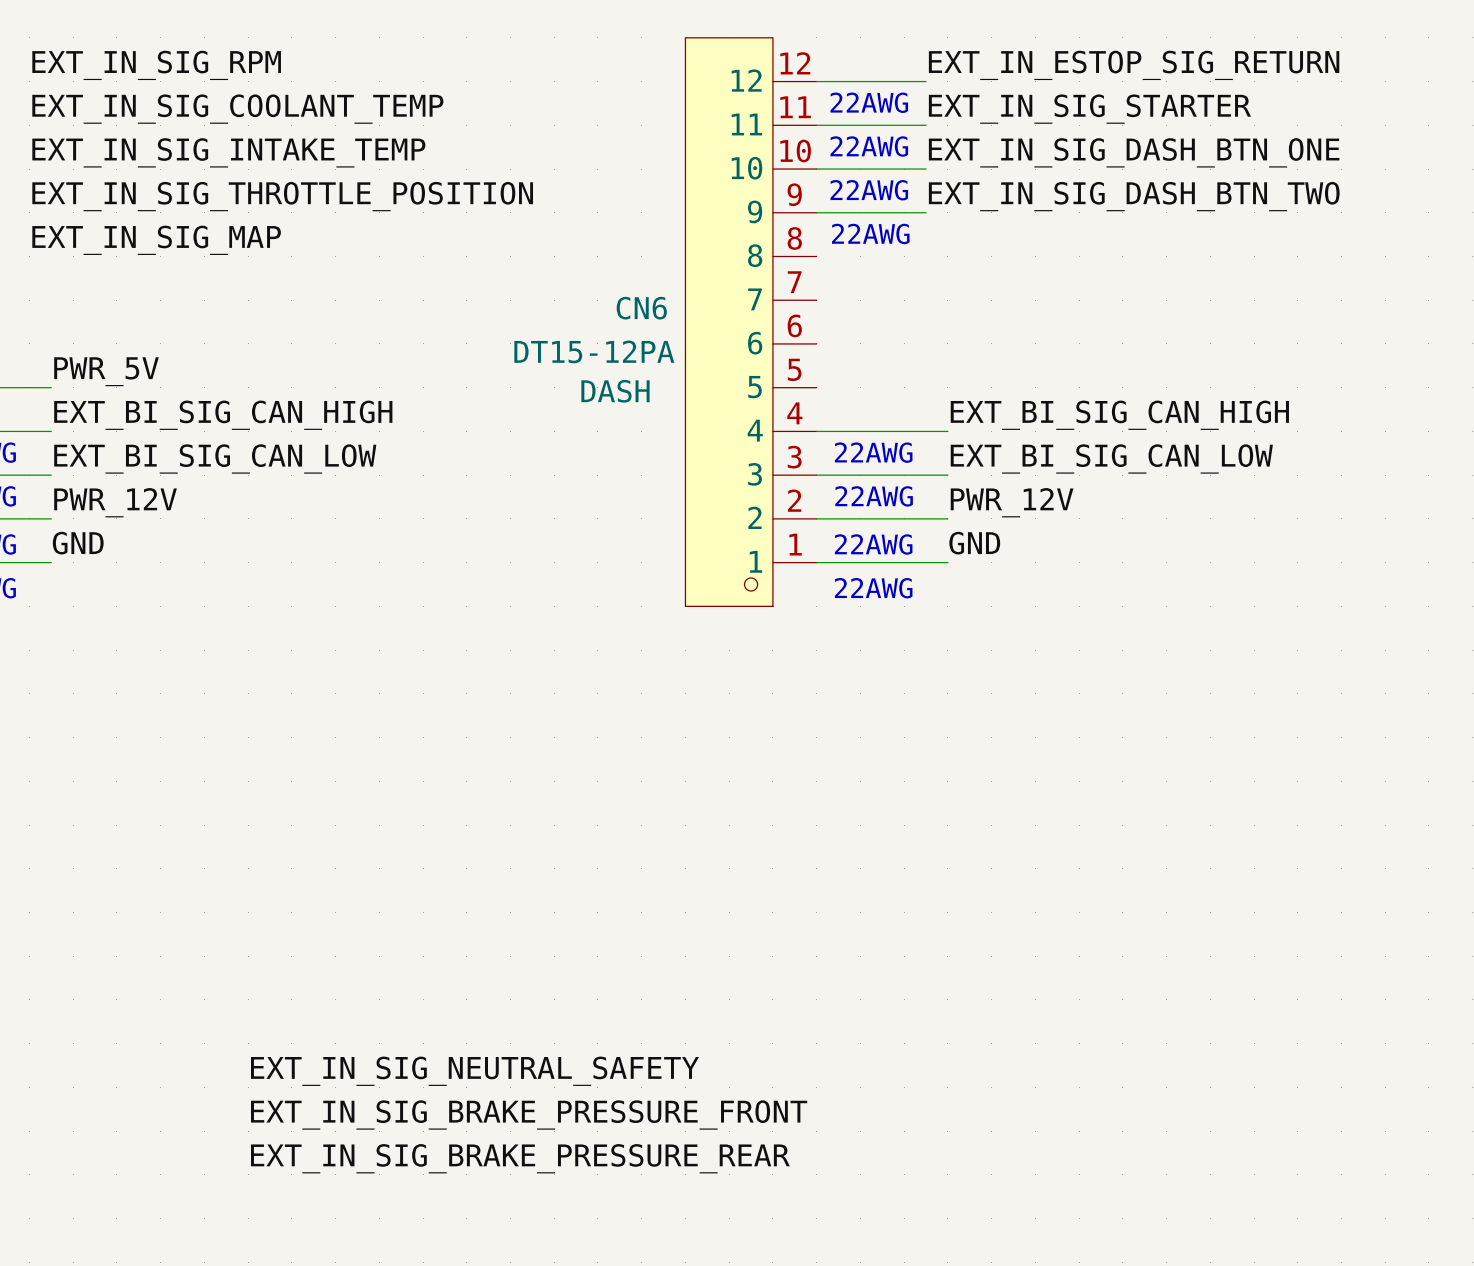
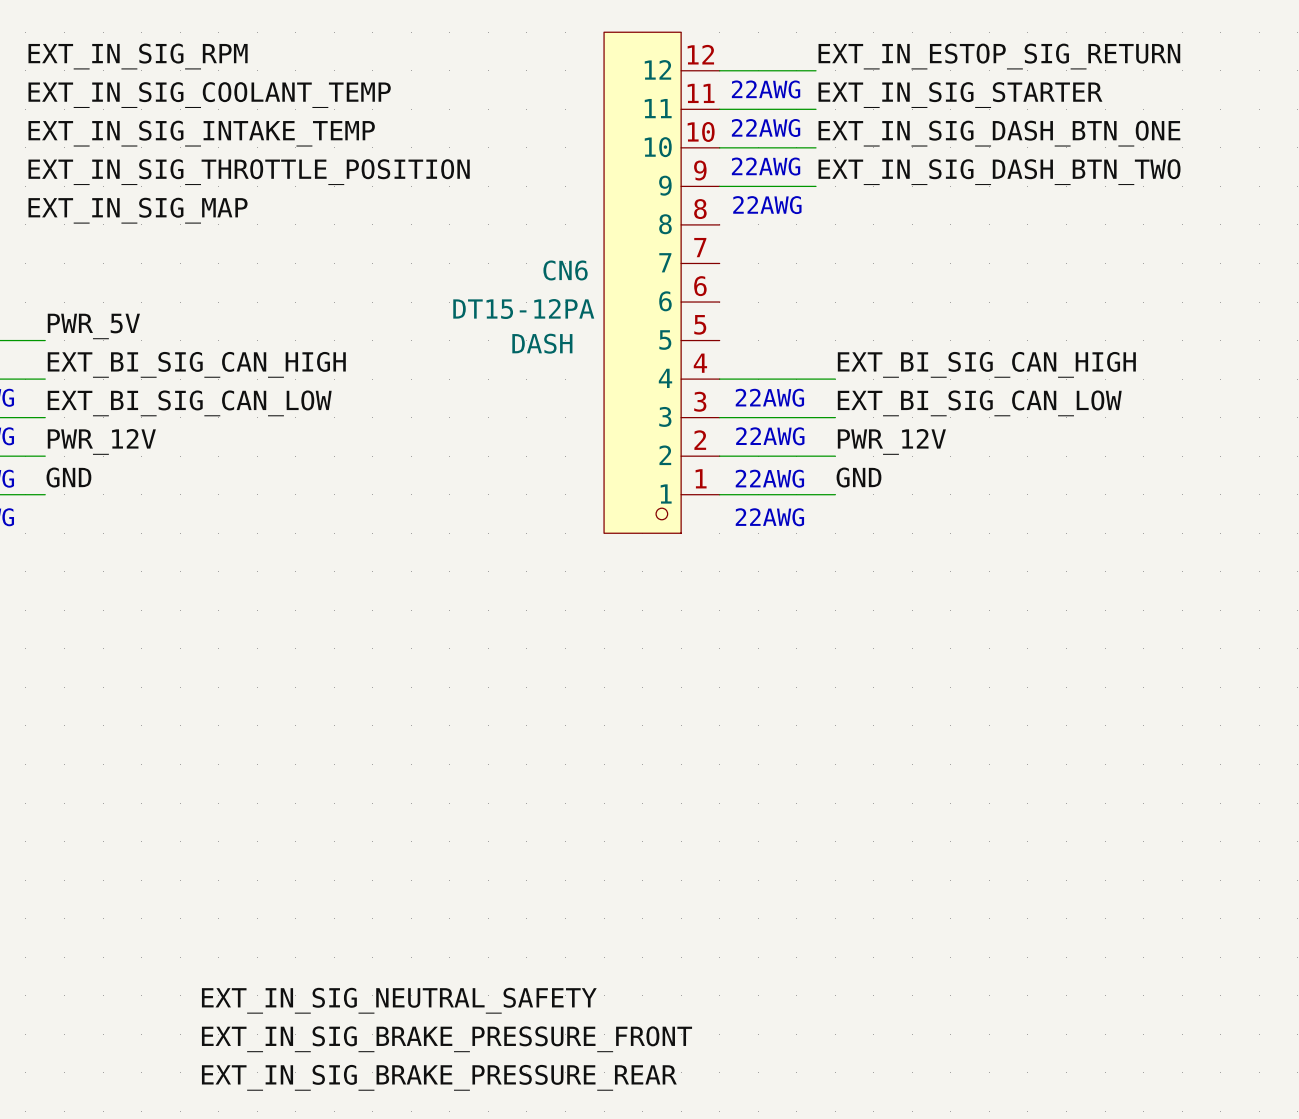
label position: EXT_IN_SIG_NEUTRAL_SAFETY (475, 1071) -> EXT_IN_SIG_NEUTRAL_SAFETY (399, 1000)
label position: EXT_IN_SIG_BRAKE_PRESSURE_FRONT (529, 1115) -> EXT_IN_SIG_BRAKE_PRESSURE_FRONT (447, 1039)
label position: EXT_IN_SIG_BRAKE_PRESSURE_REAR (520, 1158) -> EXT_IN_SIG_BRAKE_PRESSURE_REAR (439, 1077)

